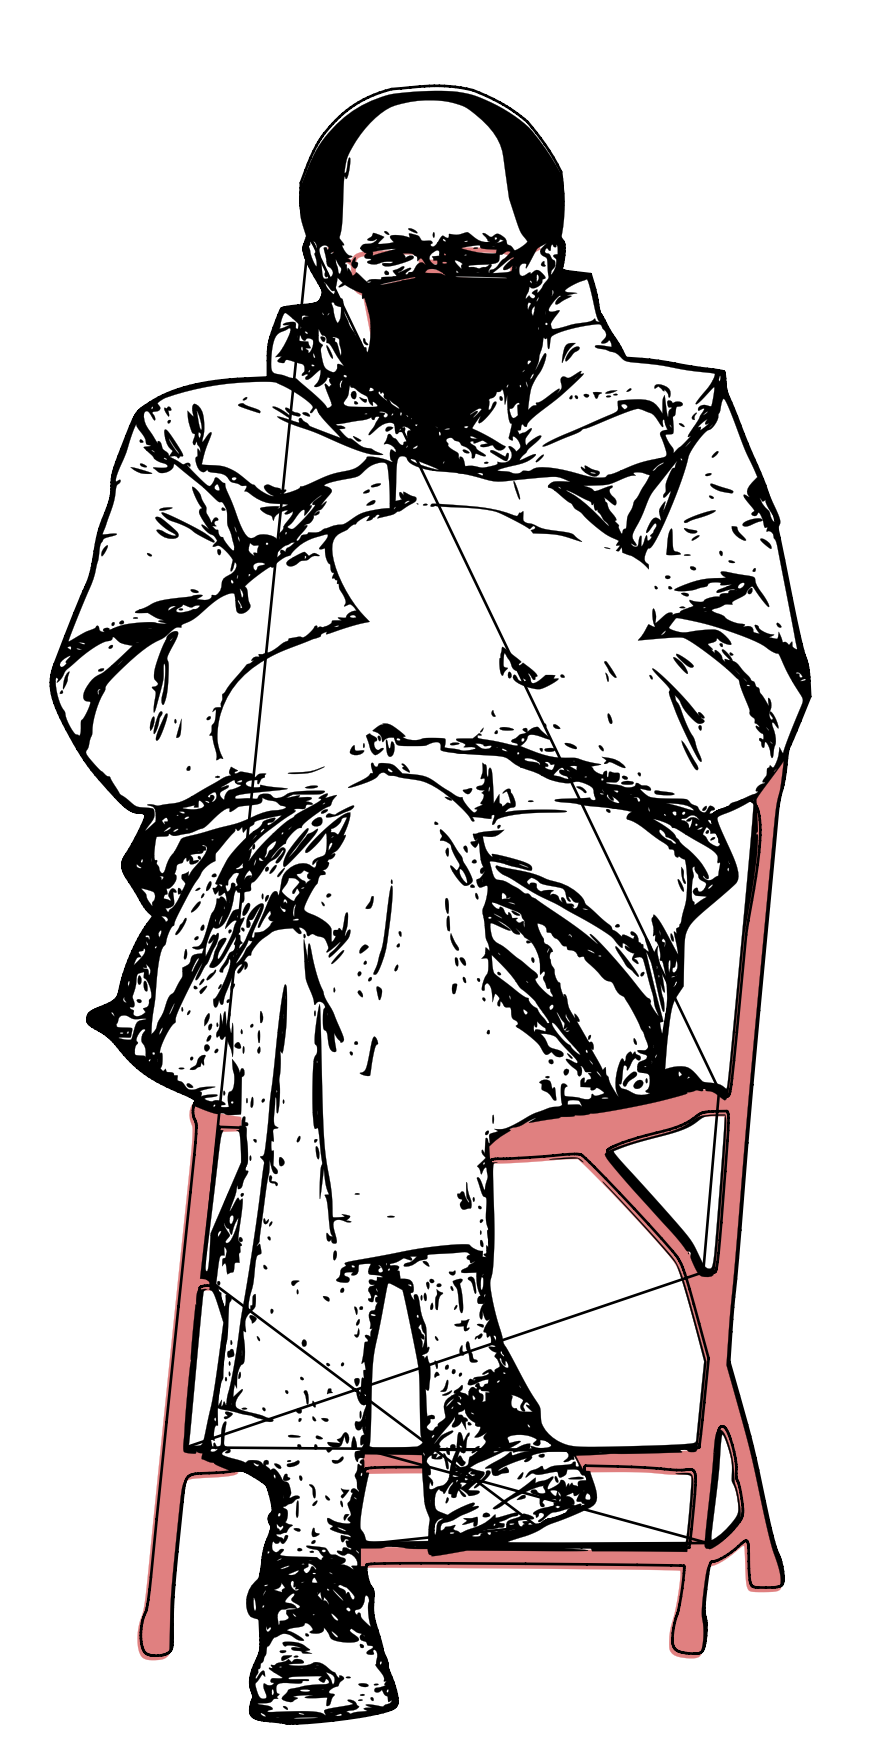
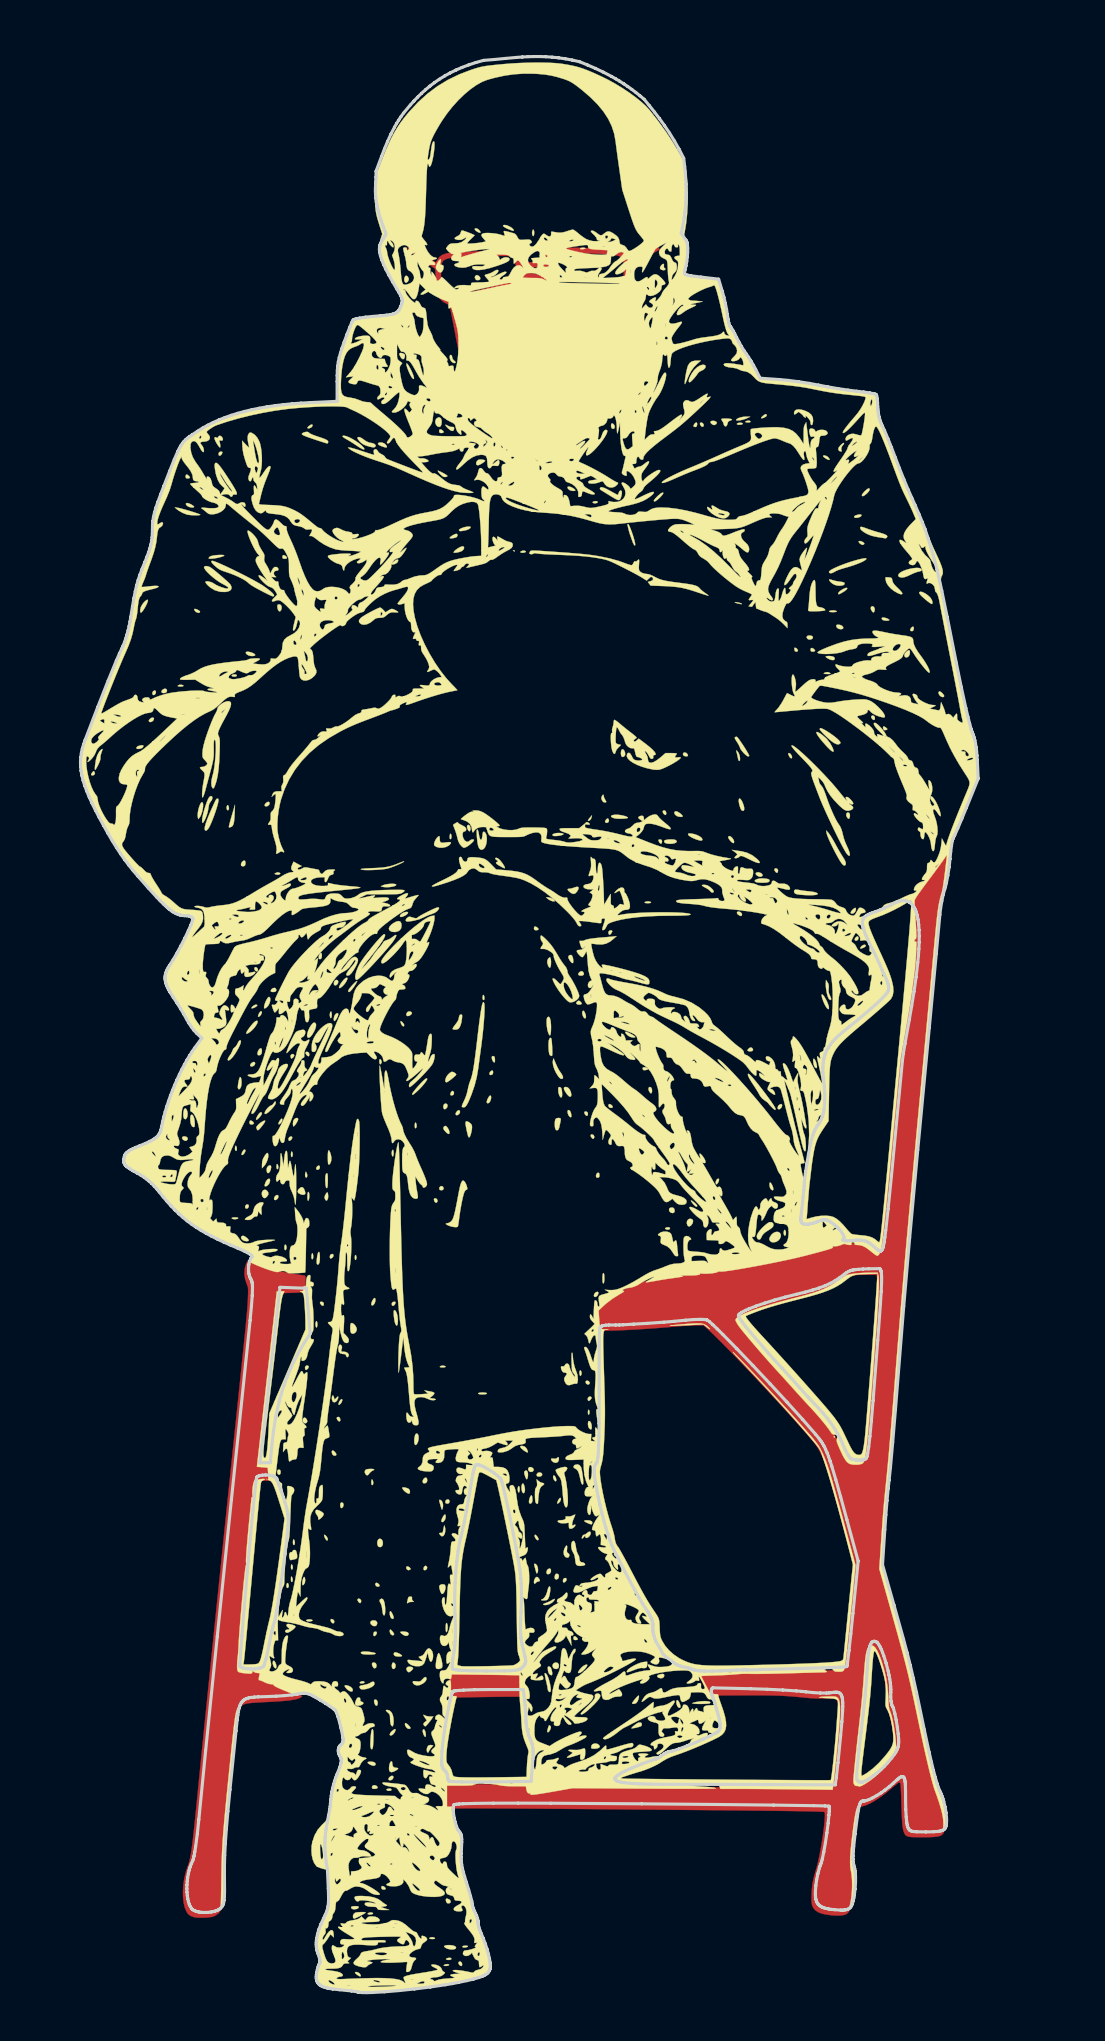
board edge: (308, 234) (719, 1090) (703, 1272) (185, 1447) (568, 1450) (365, 1449) (707, 1543) (362, 1544) (536, 1526) (202, 1275) (308, 234) -> none

